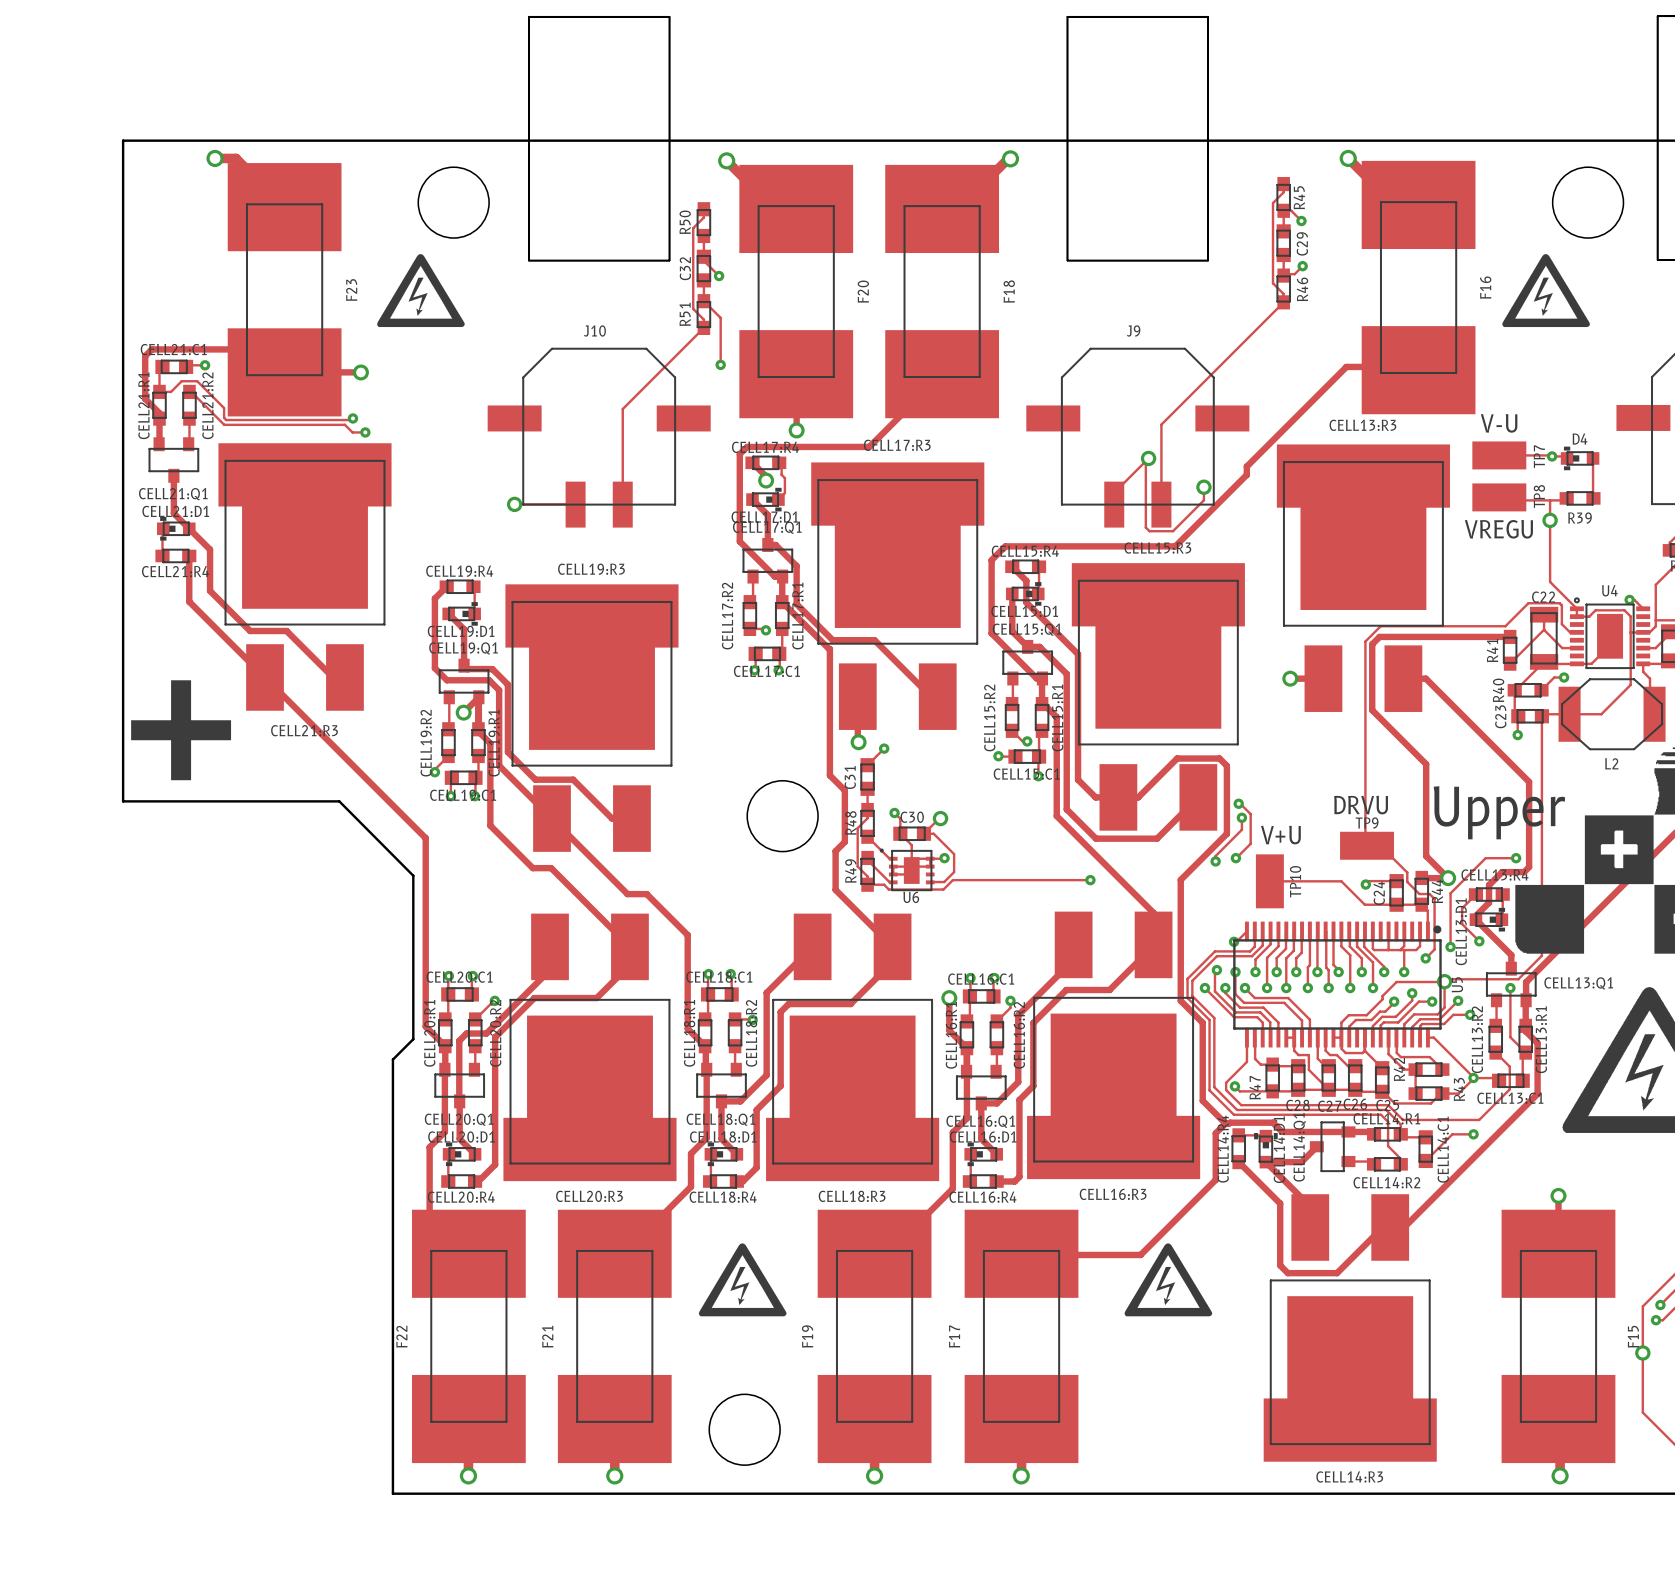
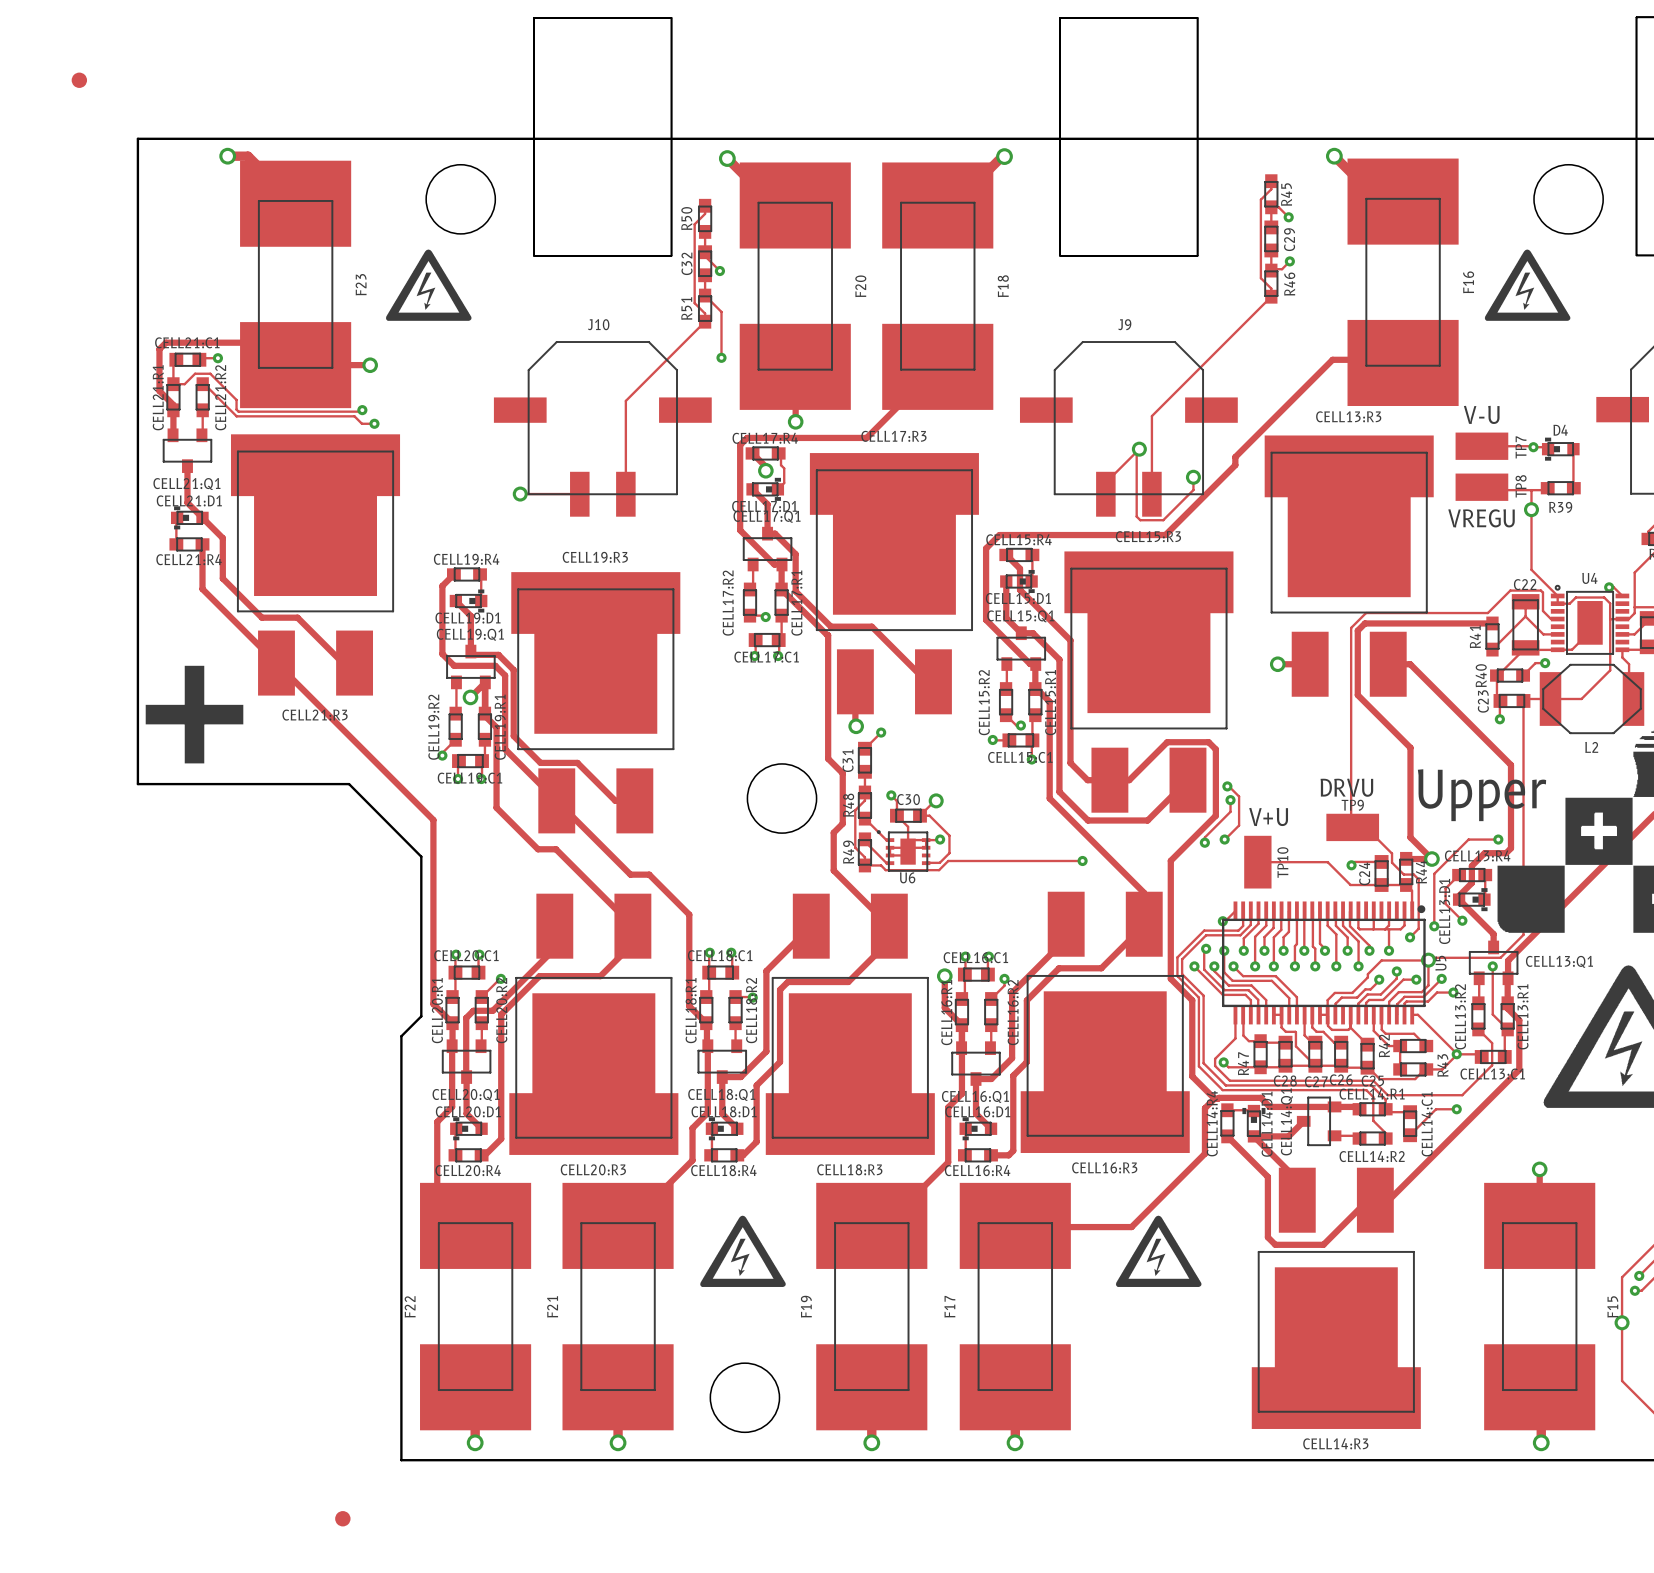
drawing: none -> [71, 72, 88, 88]
drawing: none -> [335, 1511, 351, 1527]

